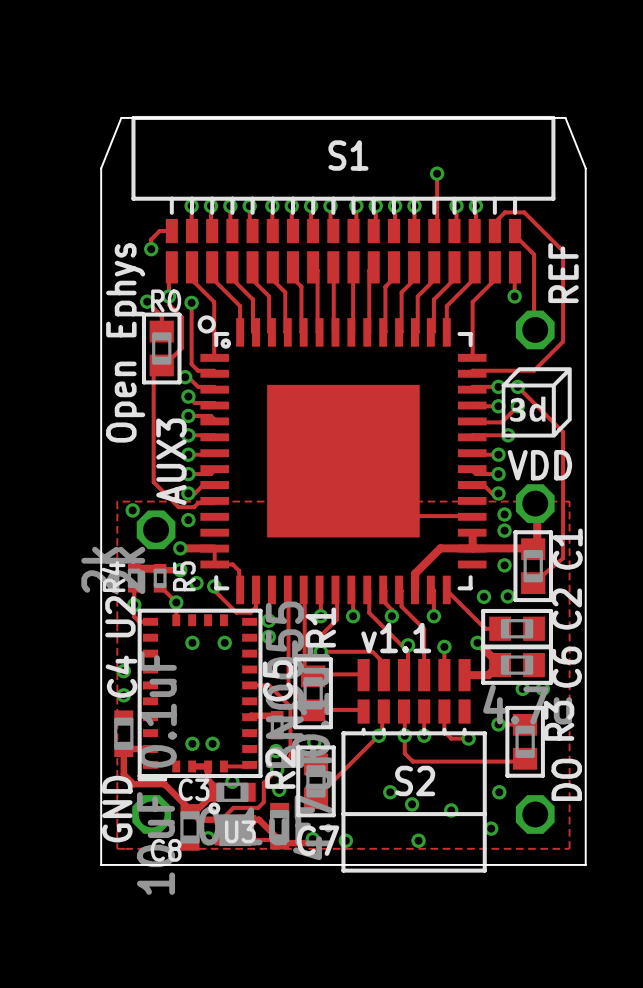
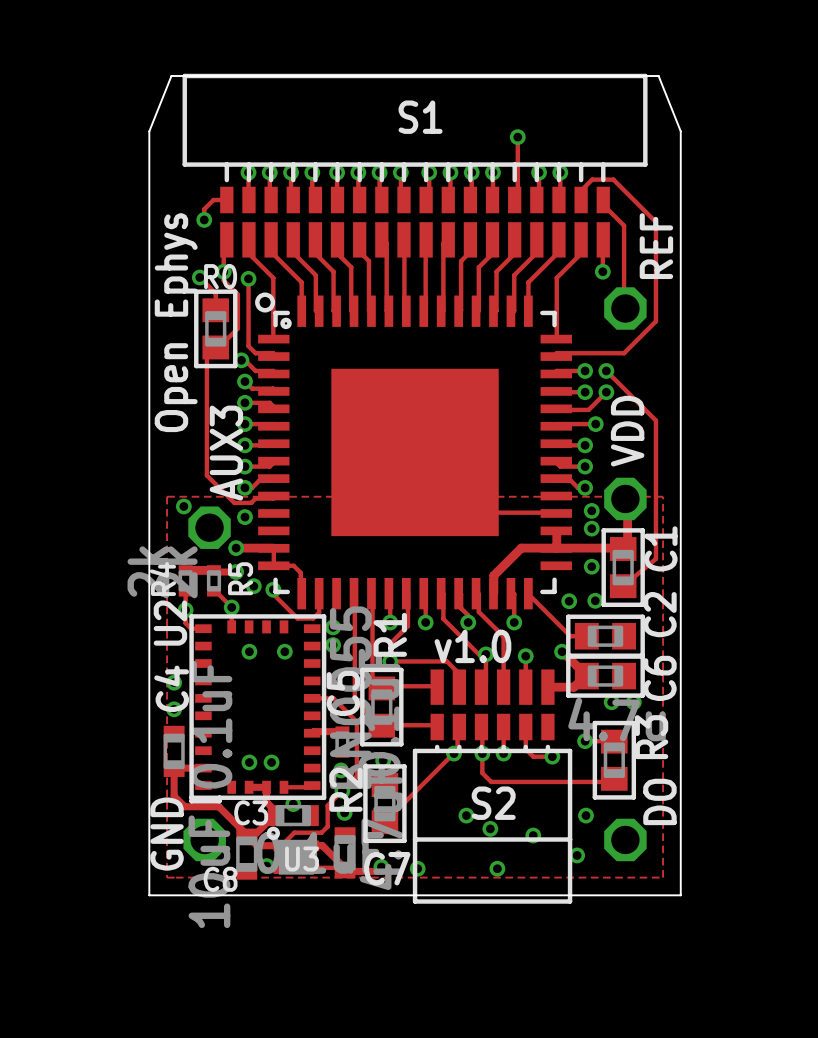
drawing: [501, 367, 572, 438] -> none
VDD name rotation: 0° (539, 465) -> 90° counterclockwise (627, 431)
text: v1.1 (396, 638) -> v1.0 (472, 646)

